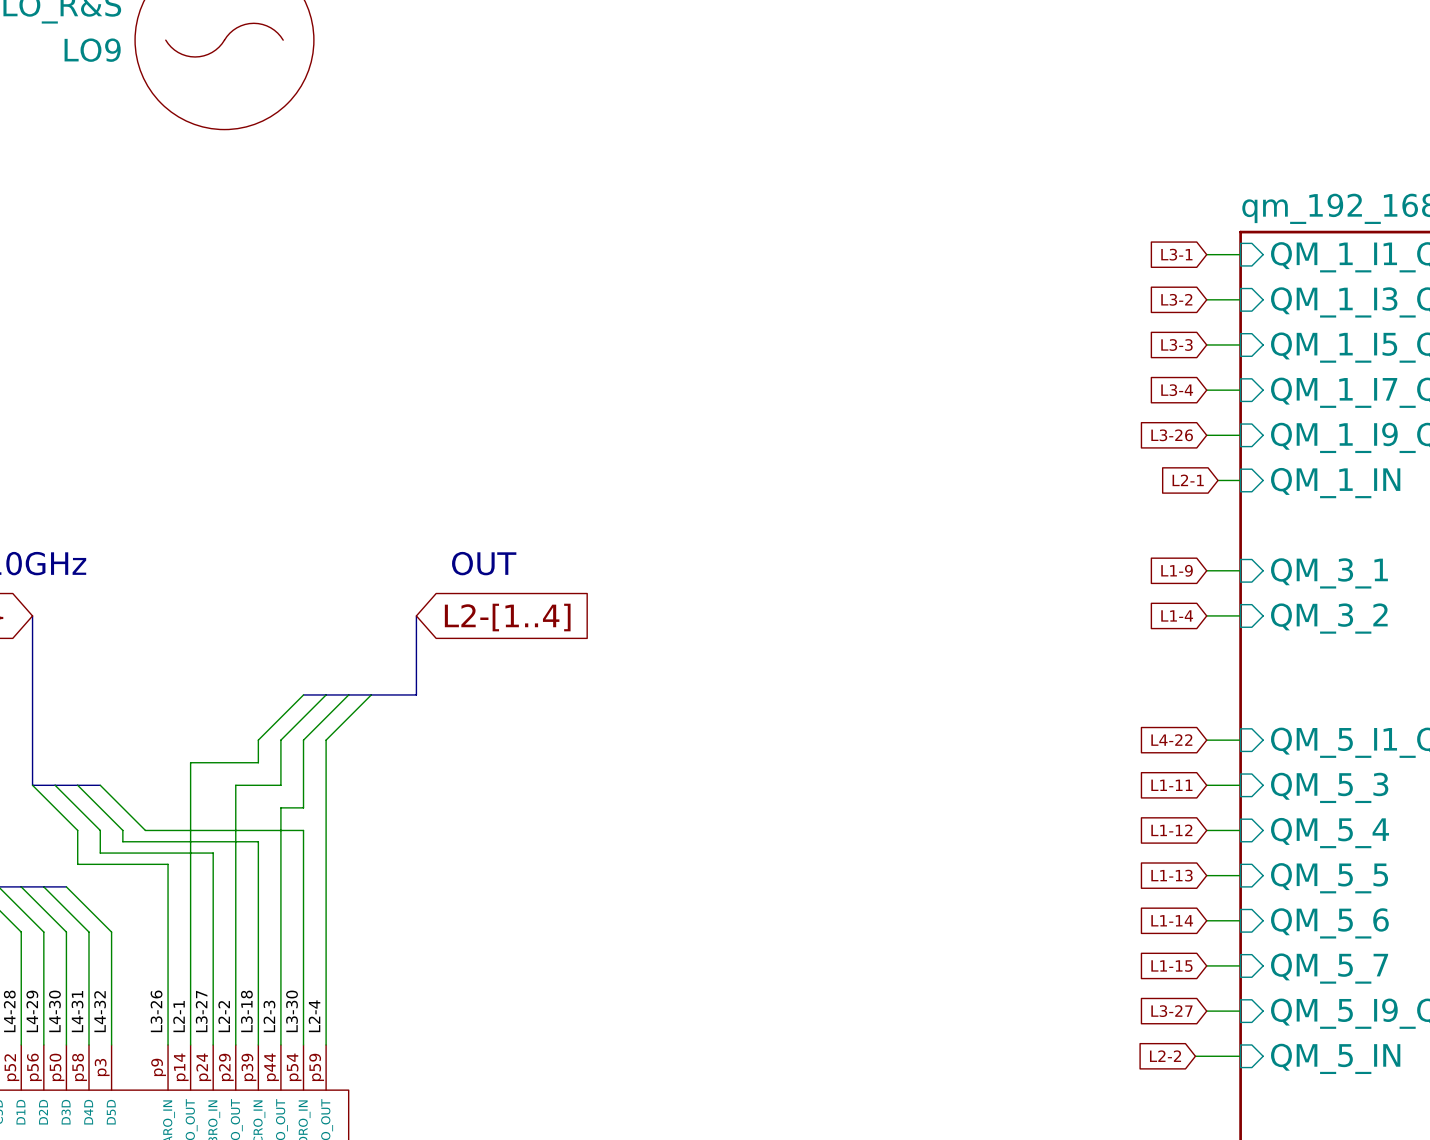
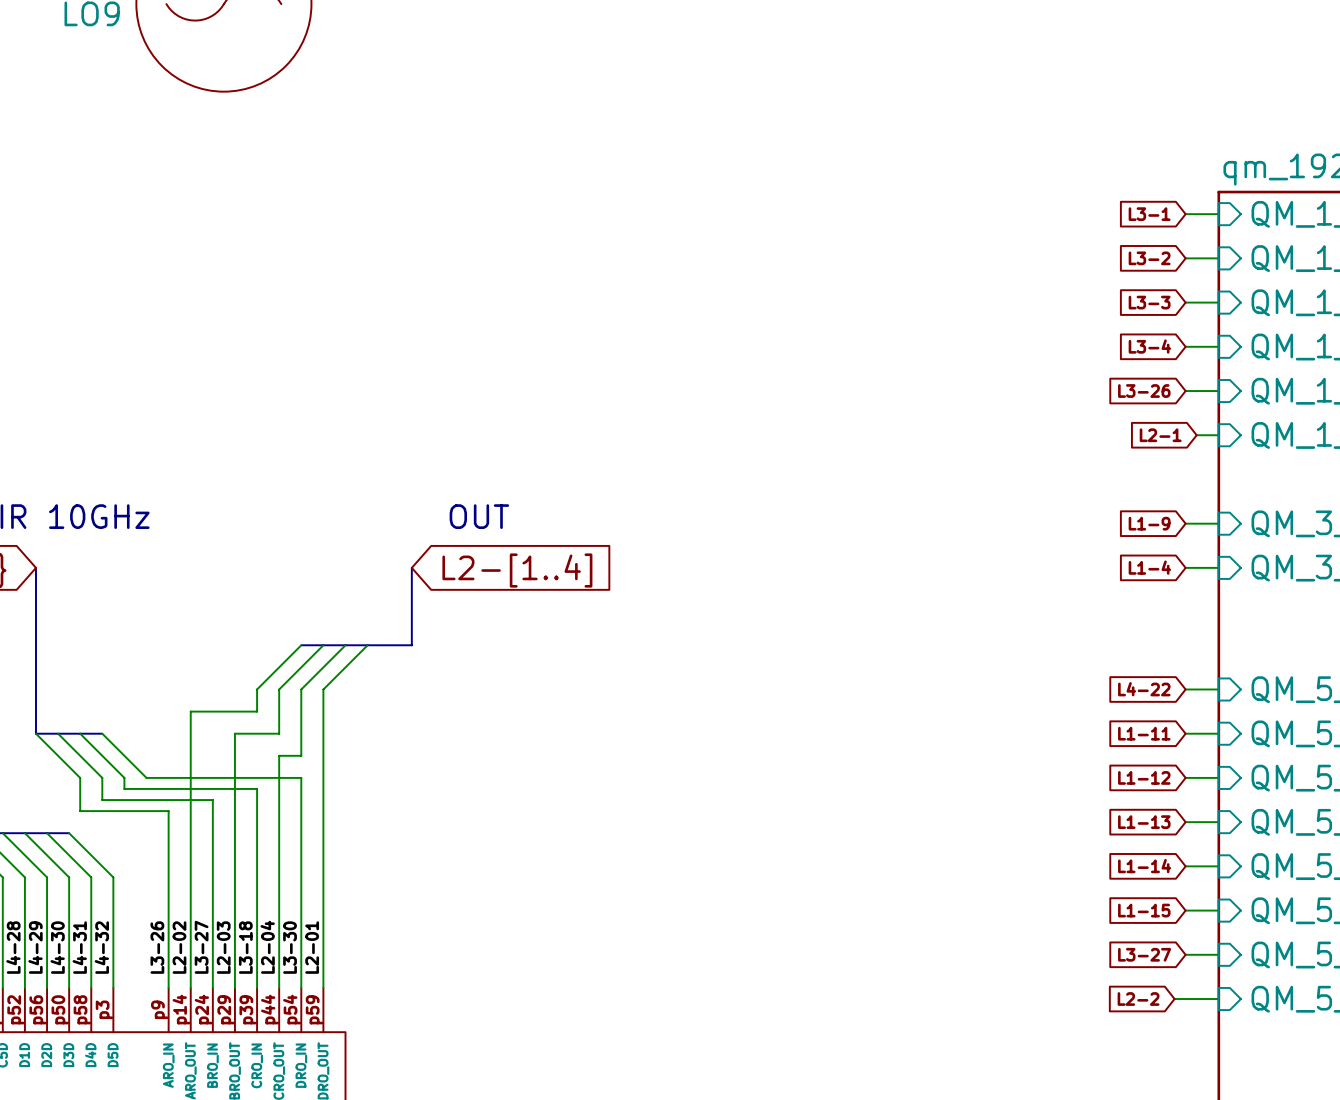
label: L2-1 (179, 1016) -> L2-02 (179, 947)
label: L2-2 (224, 1016) -> L2-03 (223, 947)
label: L2-3 (269, 1016) -> L2-04 (267, 947)
label: L2-4 (314, 1016) -> L2-01 (312, 947)

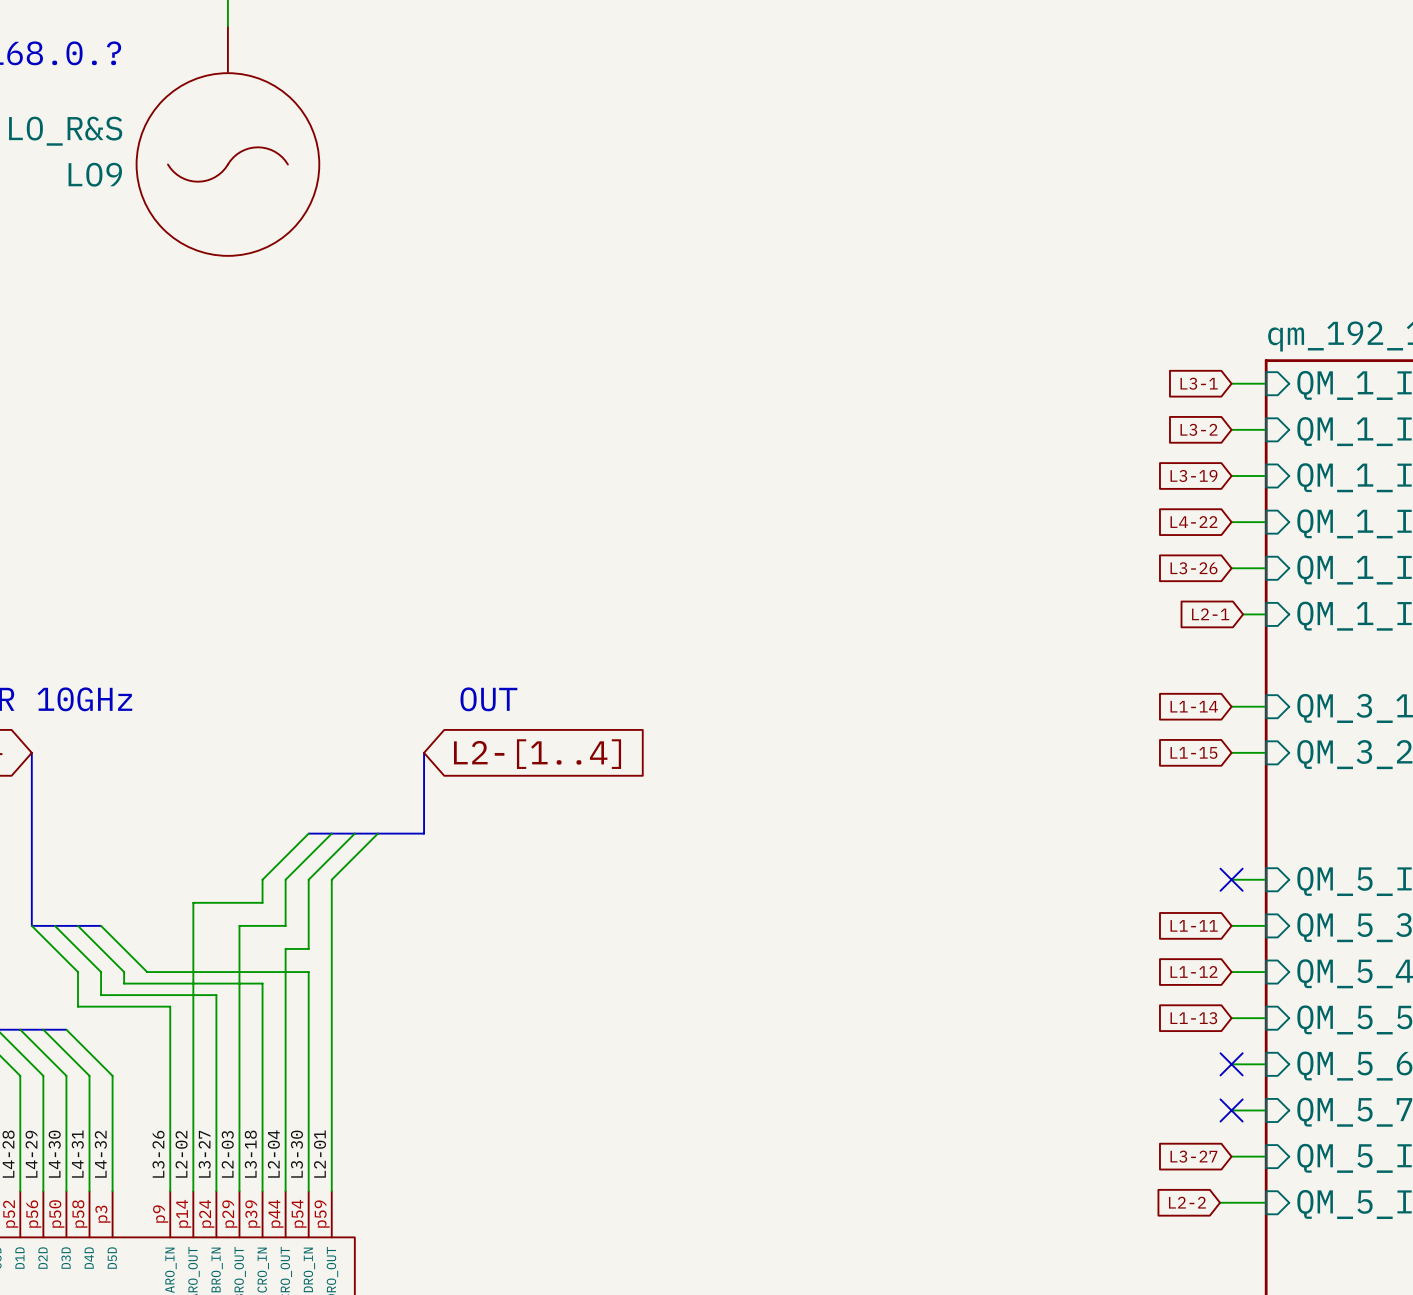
global label: L3-3 (1149, 302) -> L3-19 (1193, 475)
global label: L3-4 (1149, 346) -> L4-22 (1193, 522)
global label: L1-9 (1149, 523) -> L1-14 (1194, 706)
global label: L1-4 (1149, 567) -> L1-15 (1193, 752)
global label: L4-22 (1144, 689) -> none
no-connect mark: none -> (1231, 879)
global label: L1-14 (1144, 866) -> none
no-connect mark: none -> (1231, 1064)
global label: L1-15 (1144, 910) -> none
no-connect mark: none -> (1231, 1110)

